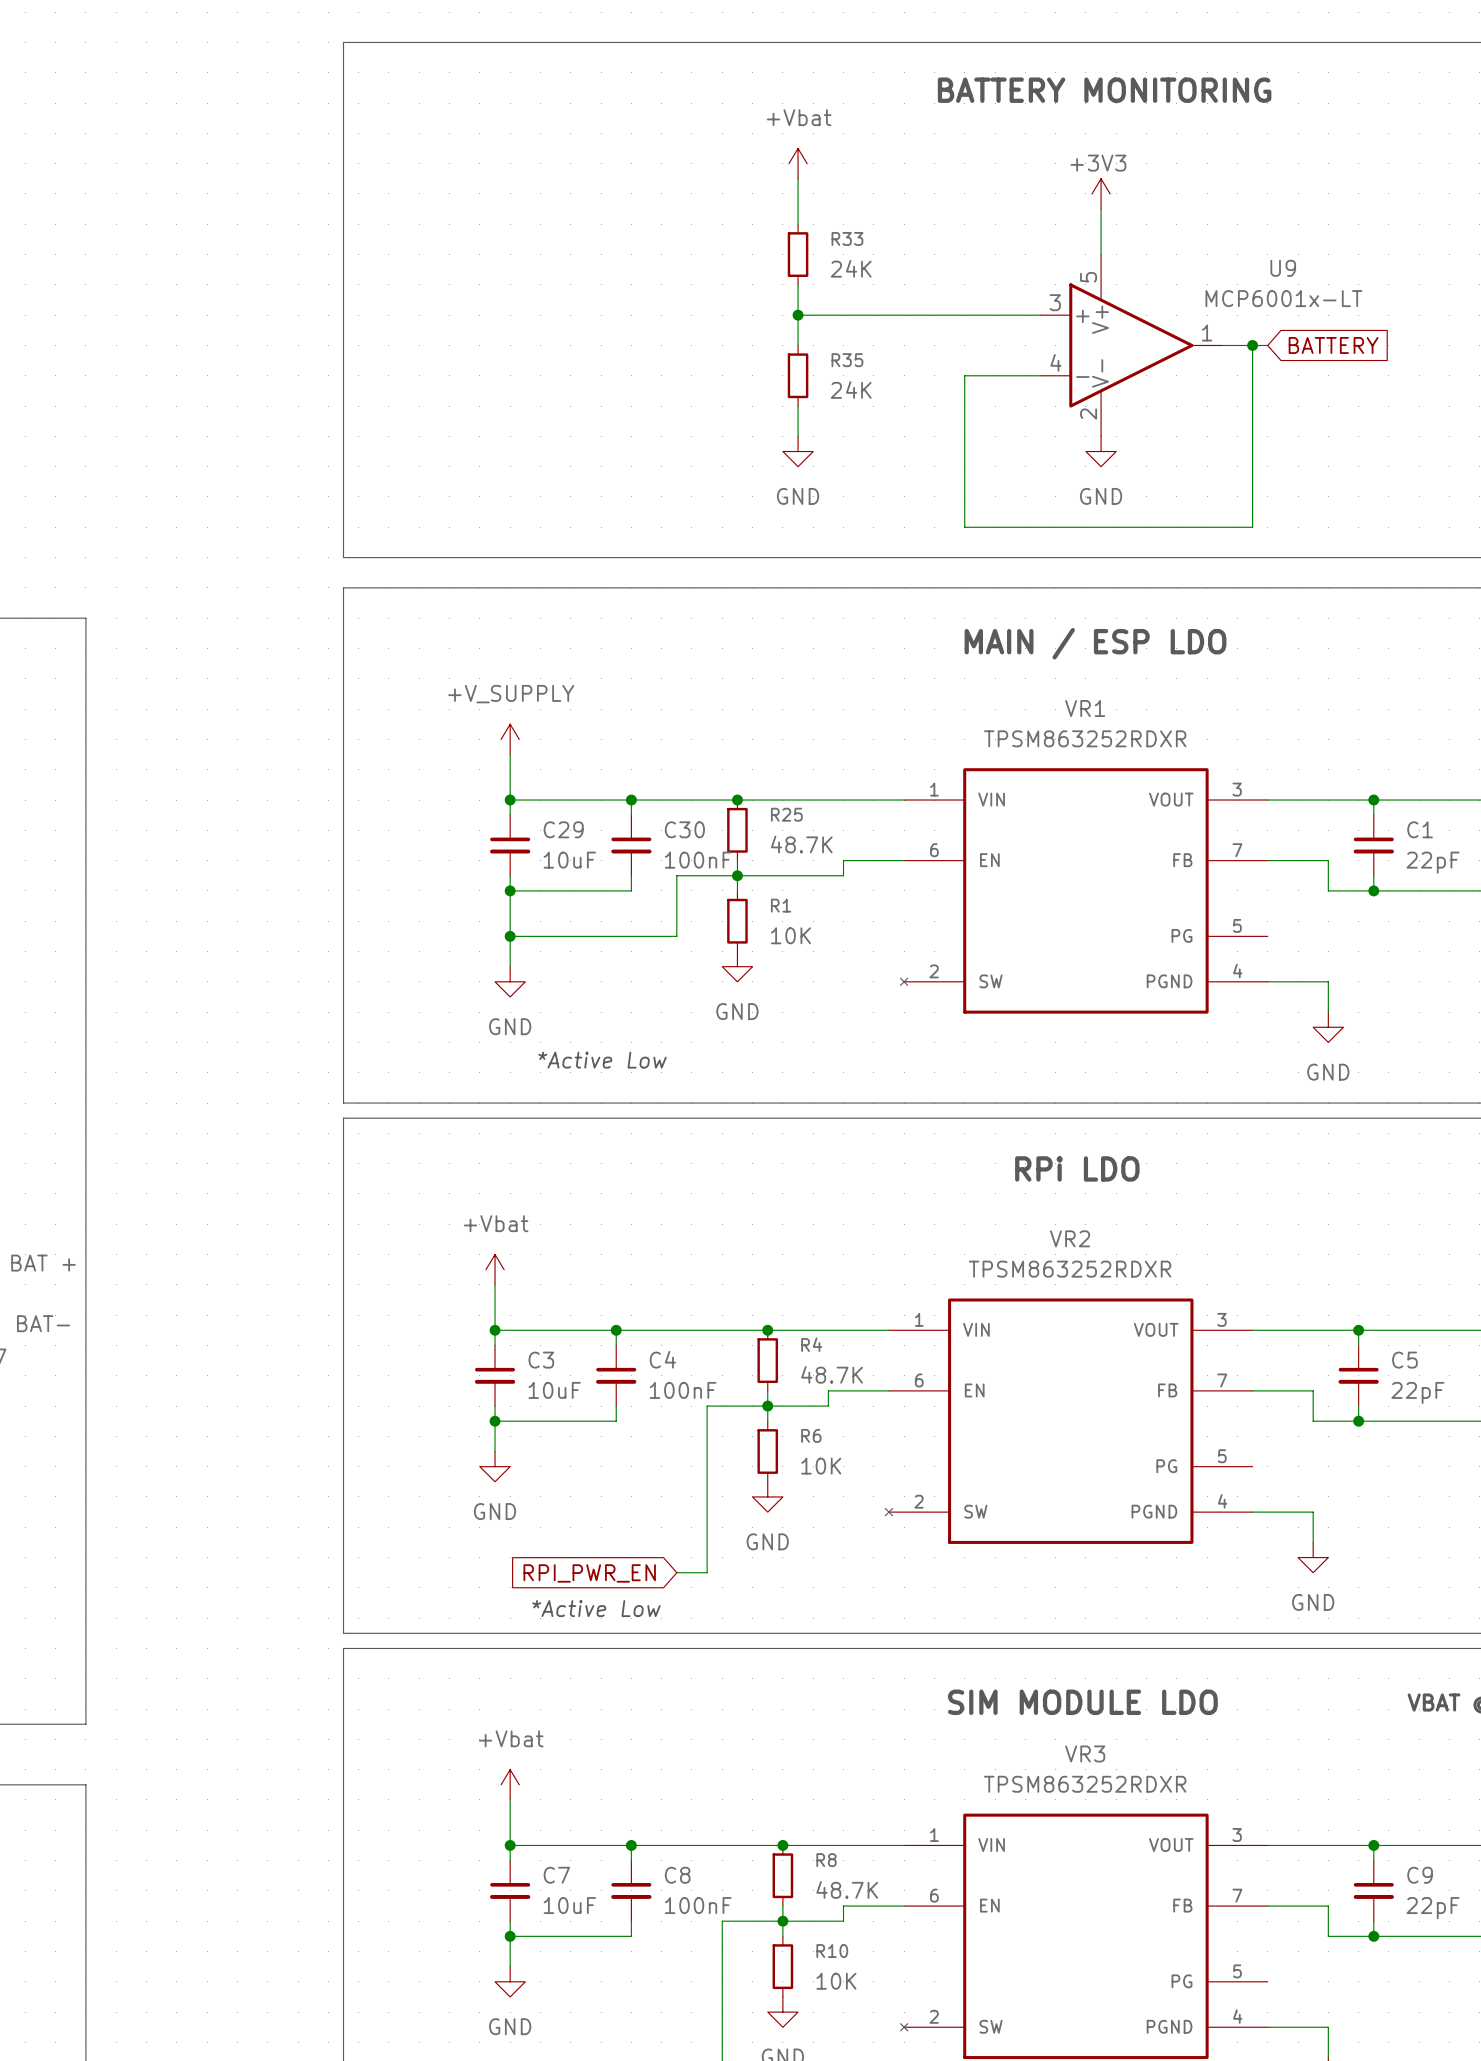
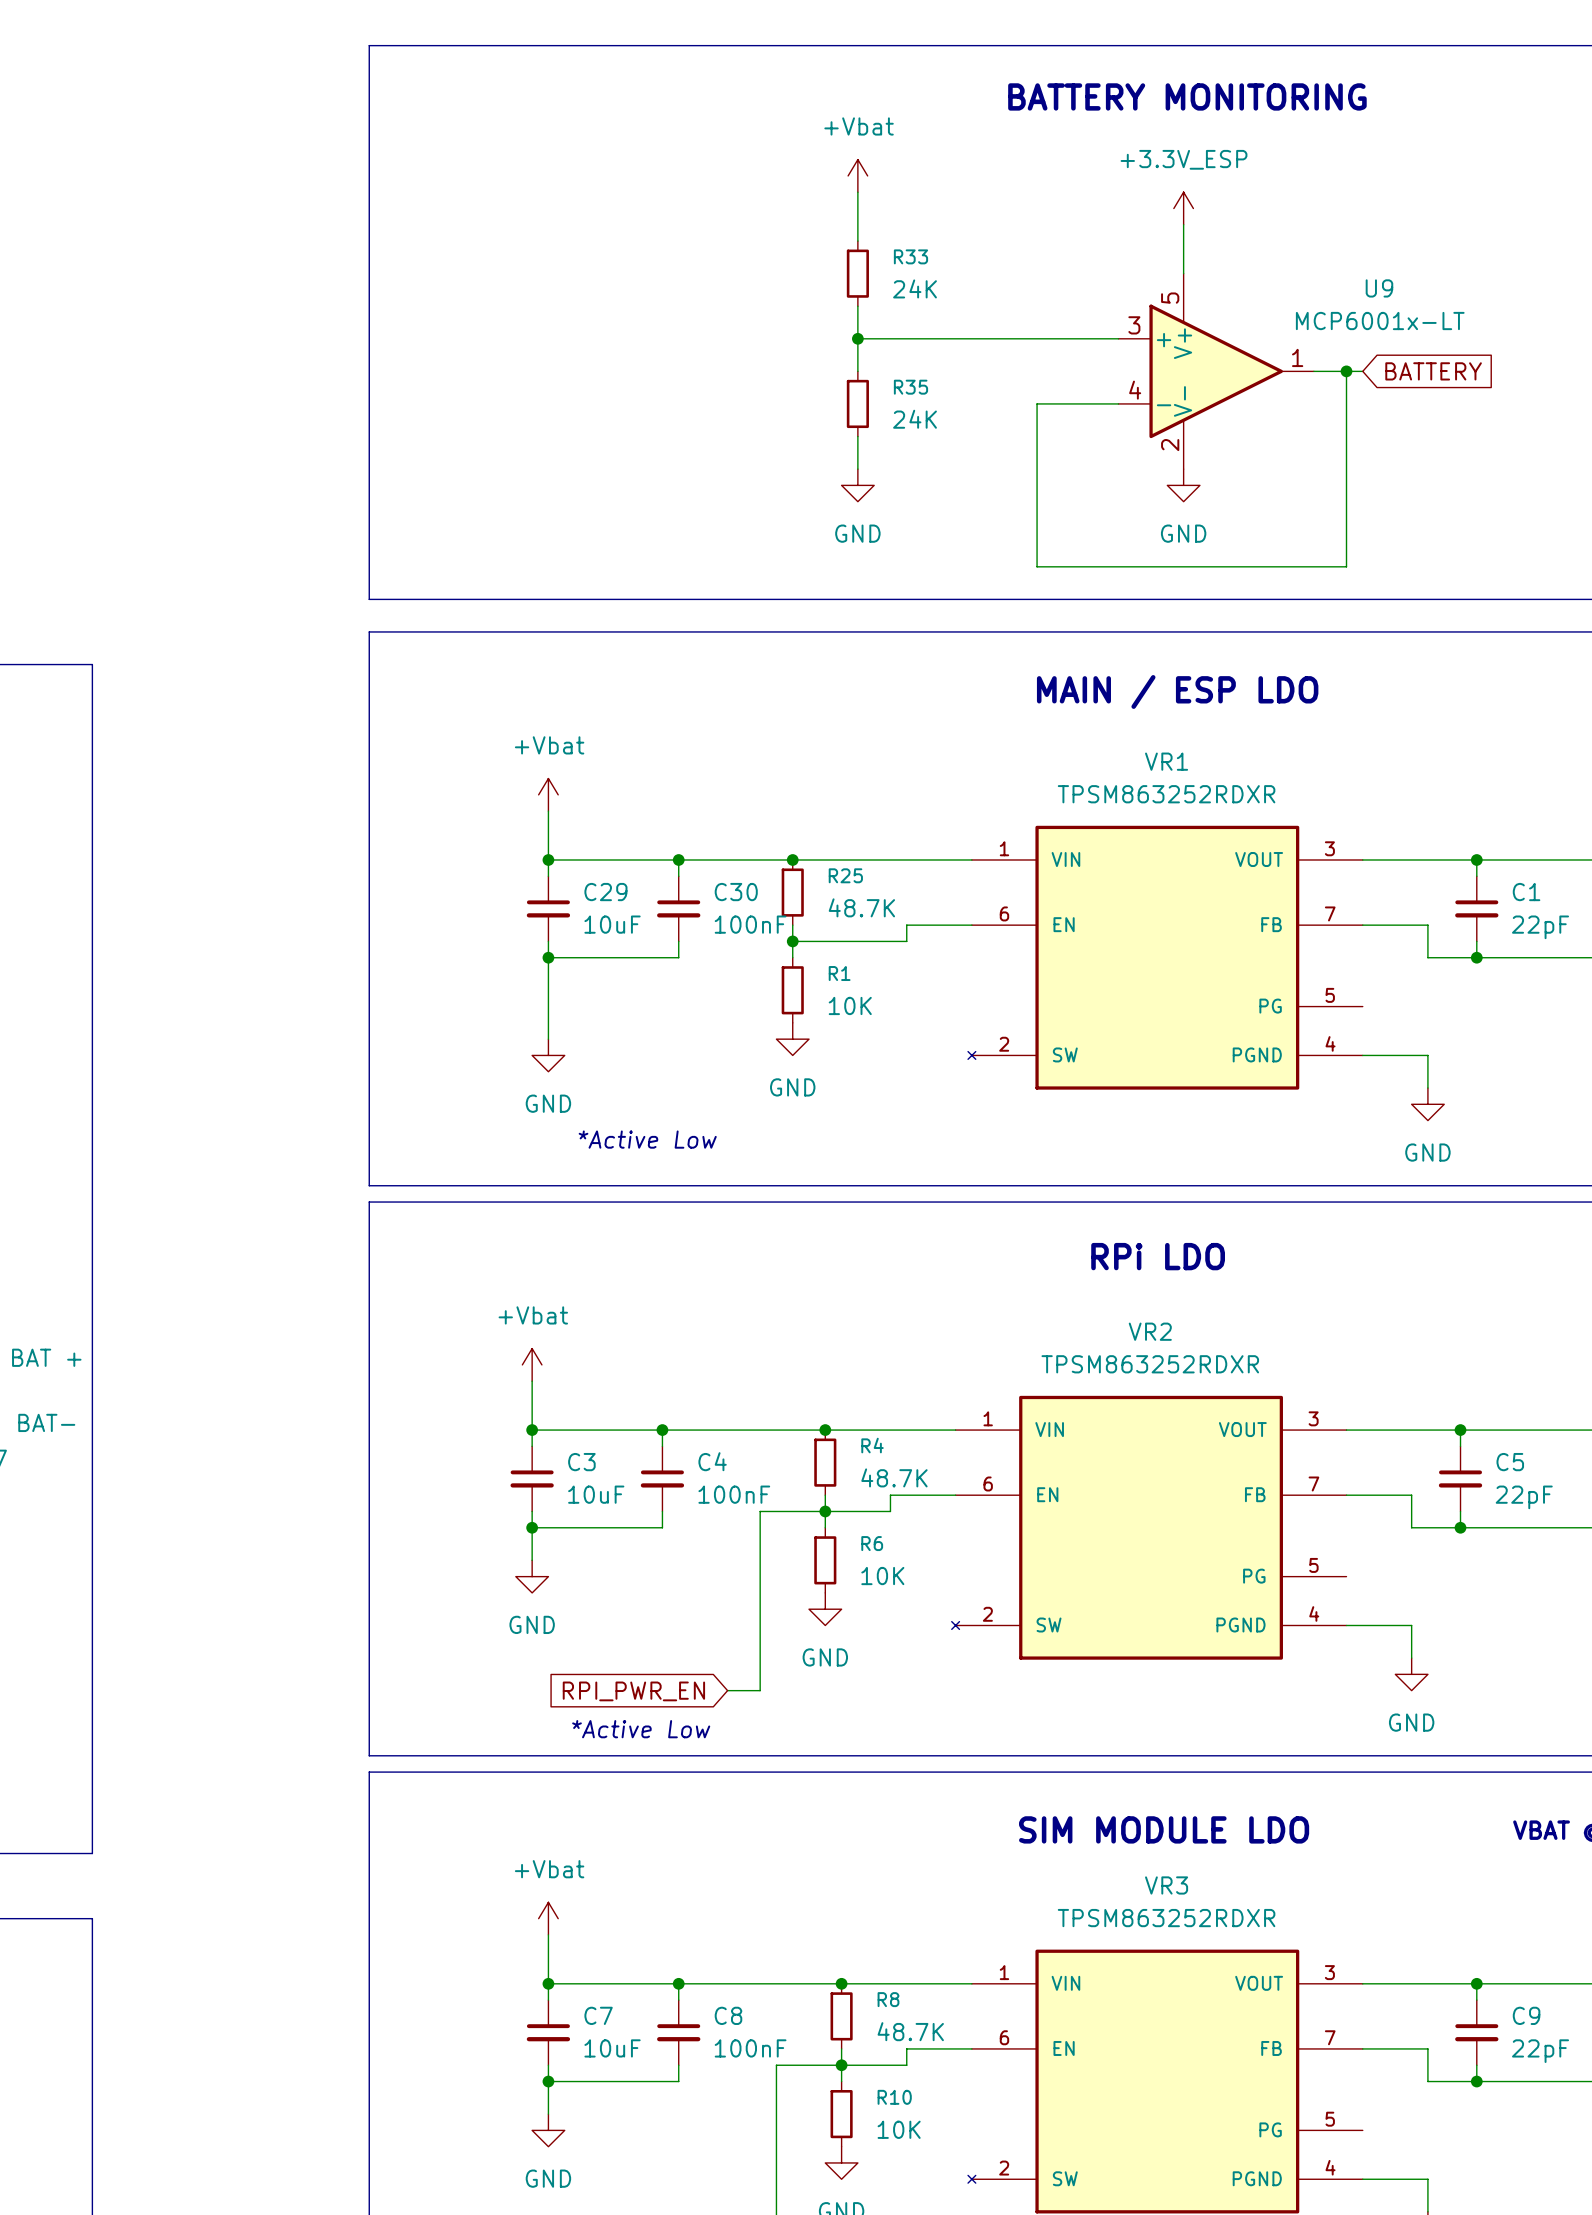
power symbol: +3V3 (1101, 193) -> +3.3V_ESP (1183, 208)
power symbol: +V_SUPPLY (510, 739) -> +Vbat (548, 794)
wire: (737, 875) (676, 875) (676, 936) (510, 936) -> none
junction: (510, 936) -> none

